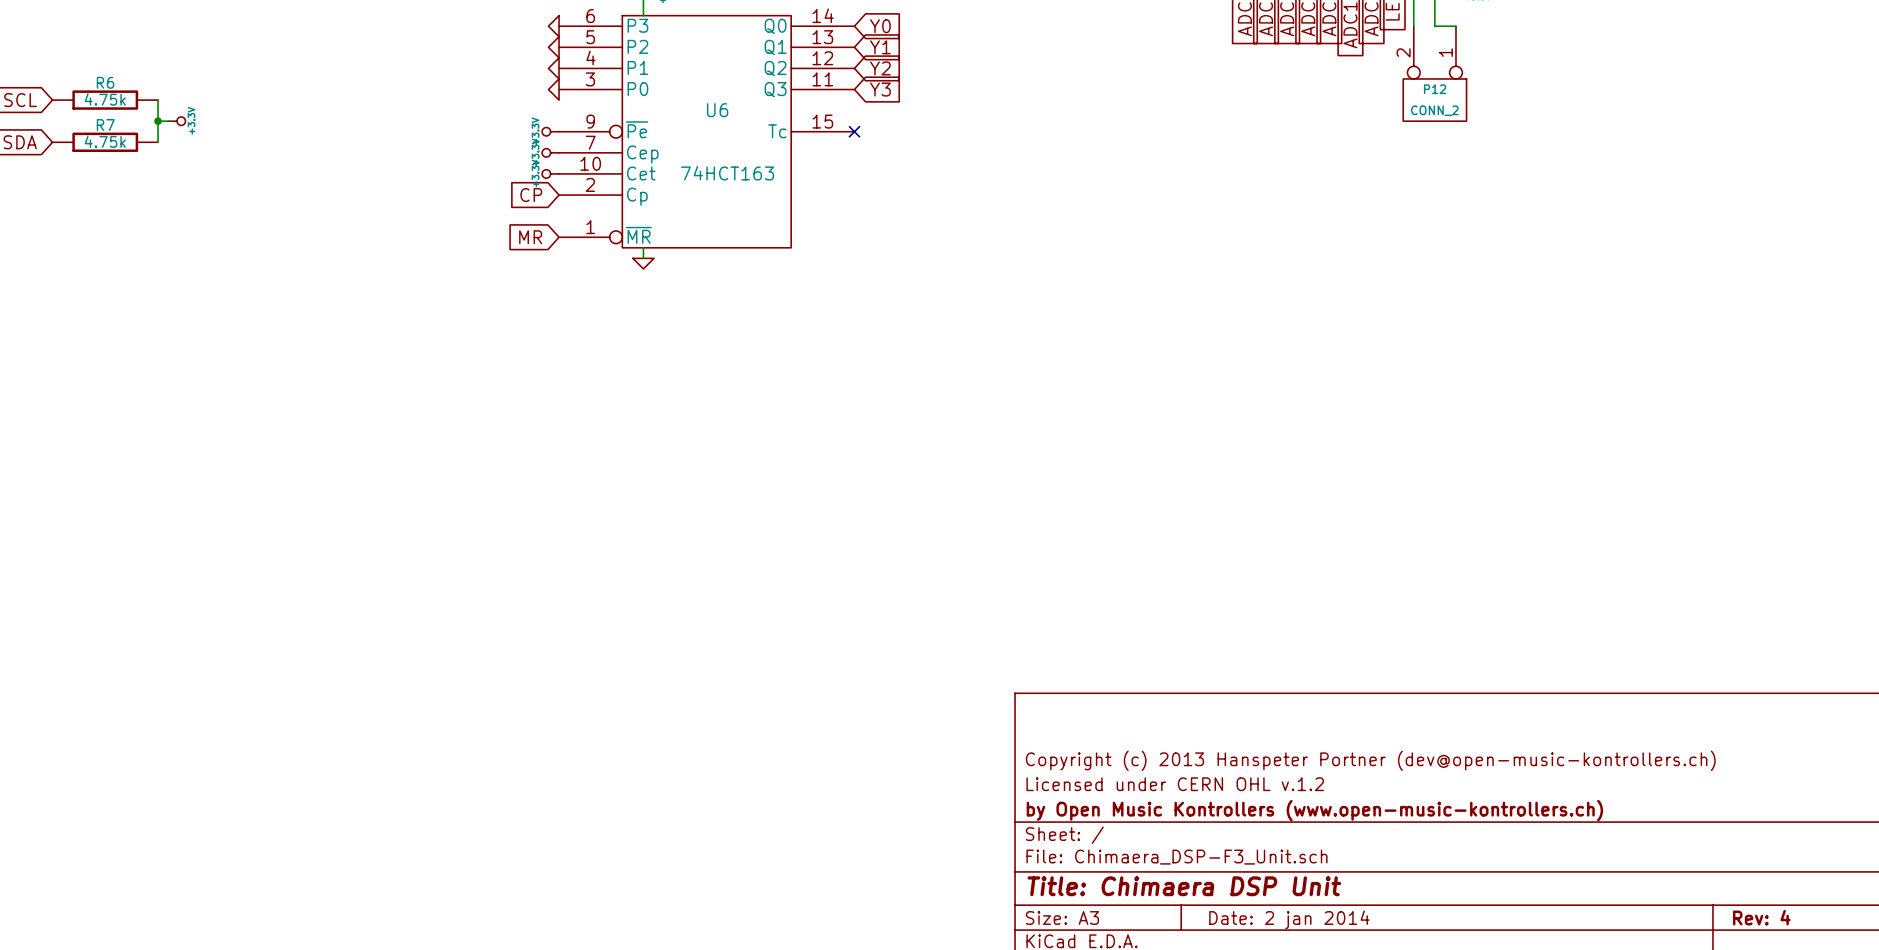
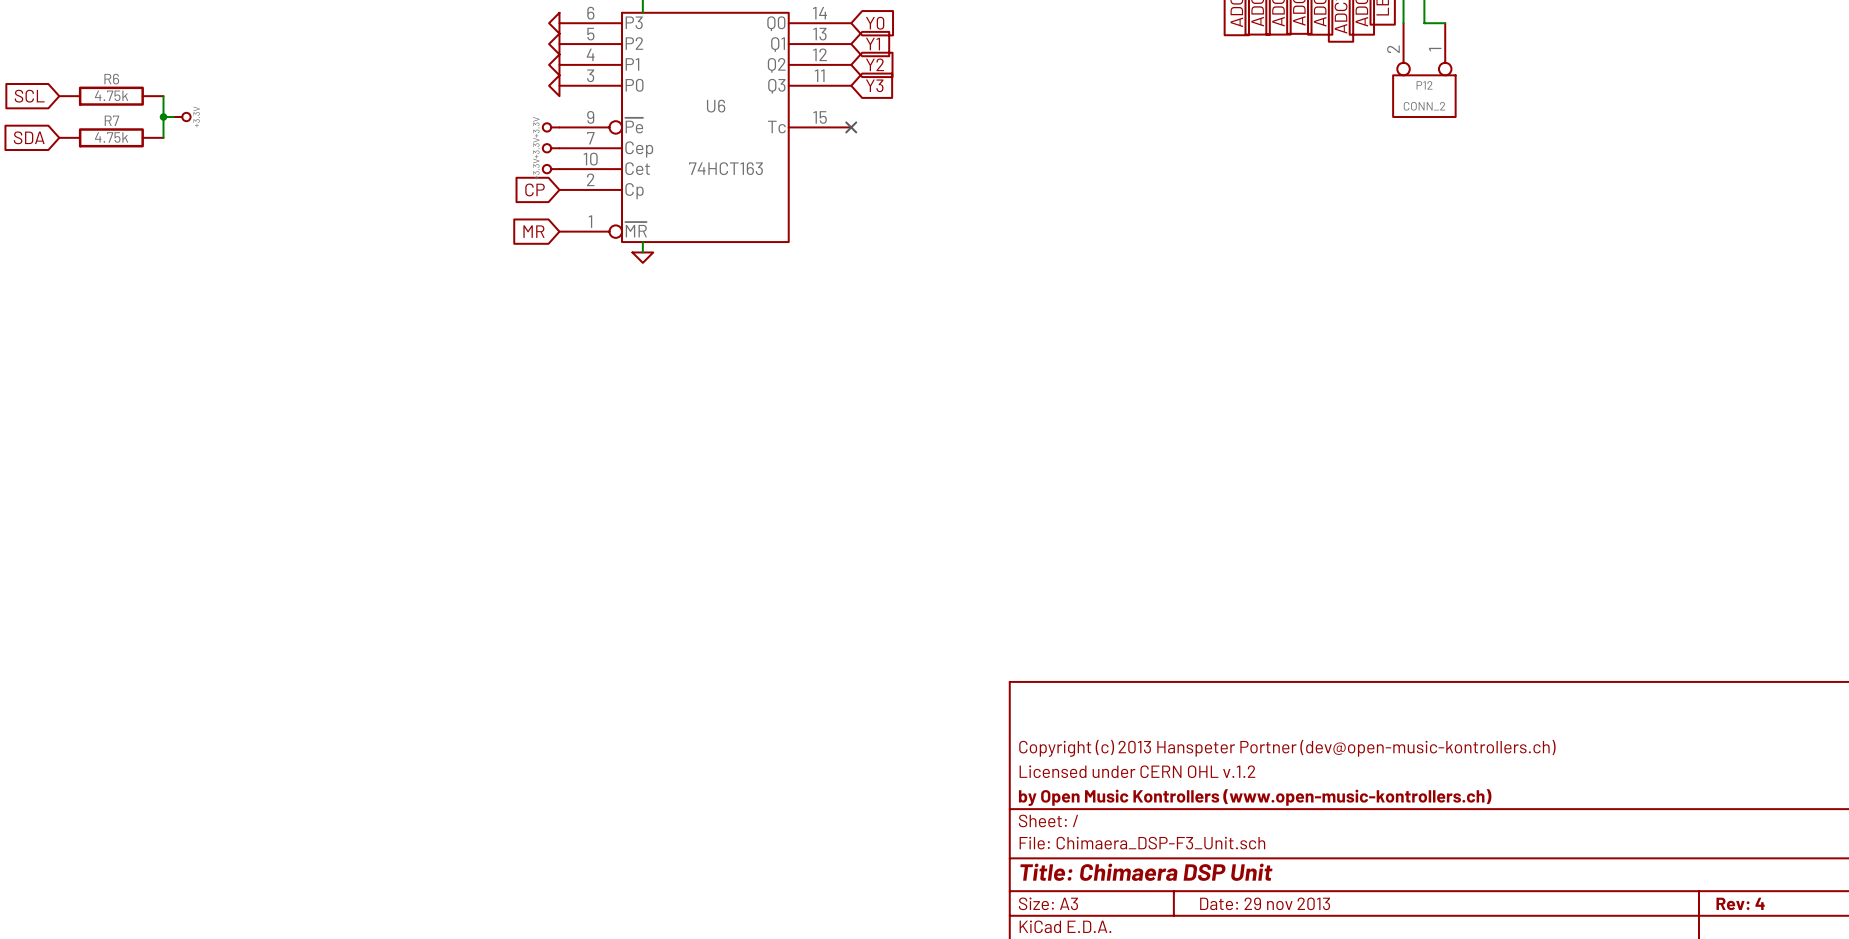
title block: Date: 2 jan 2014 (1289, 919) -> Date: 29 nov 2013 (1265, 903)

